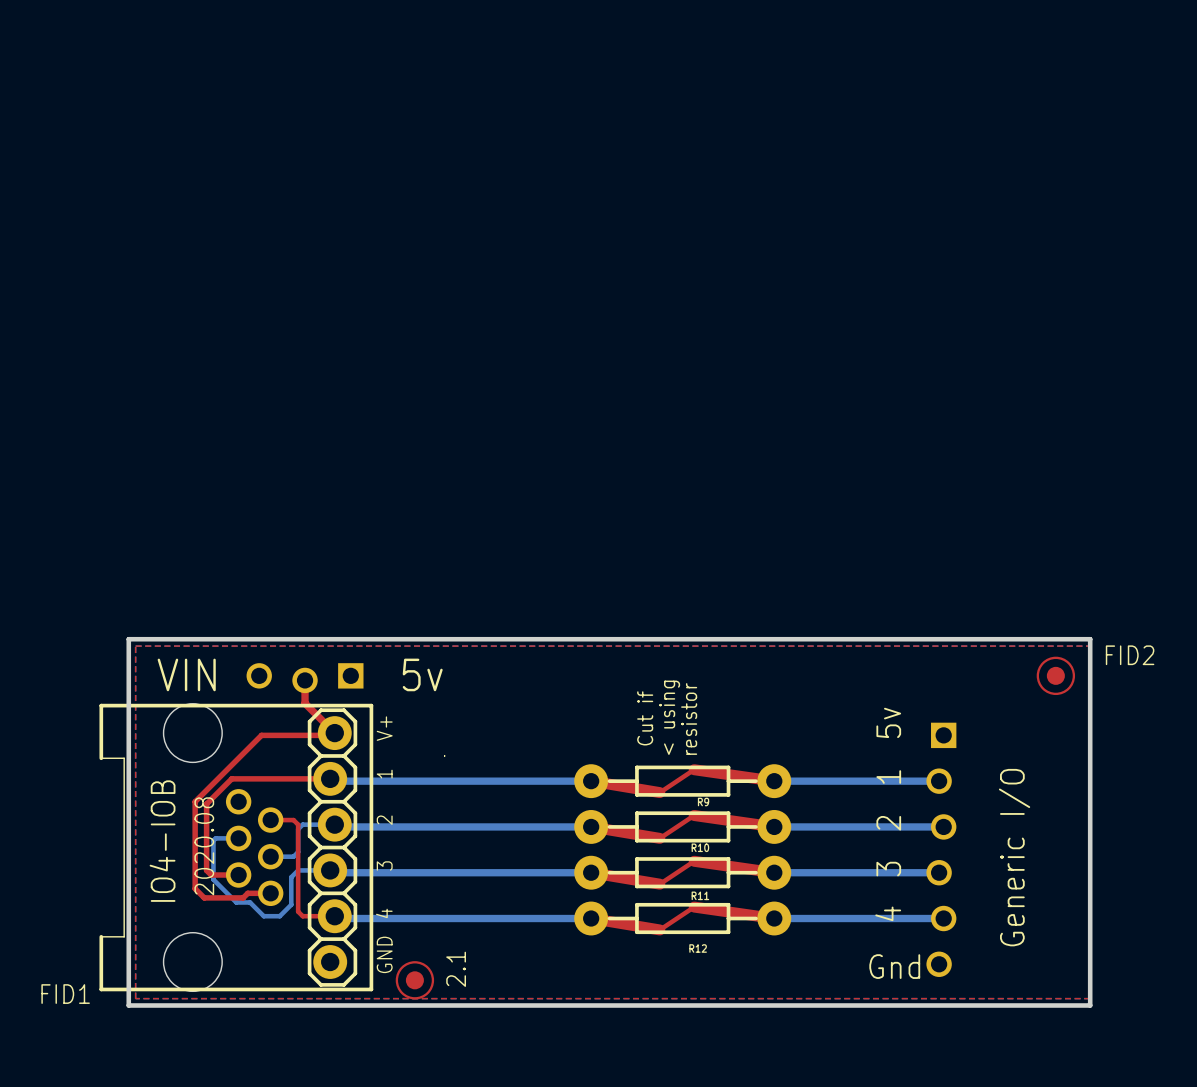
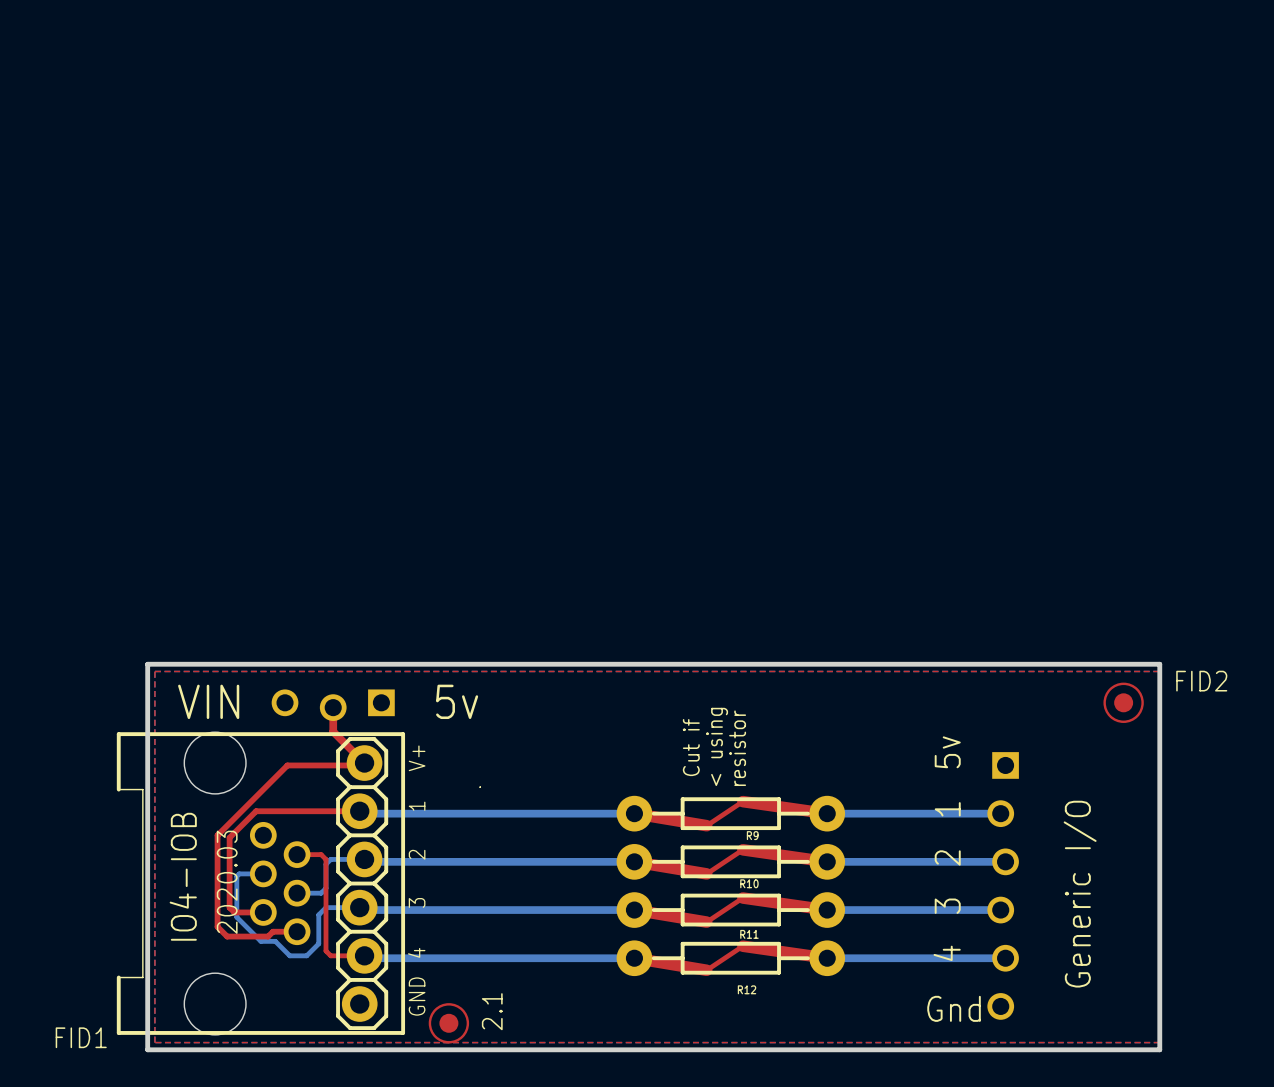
text: 2020.08 (204, 846) -> 2020.03 (227, 882)

